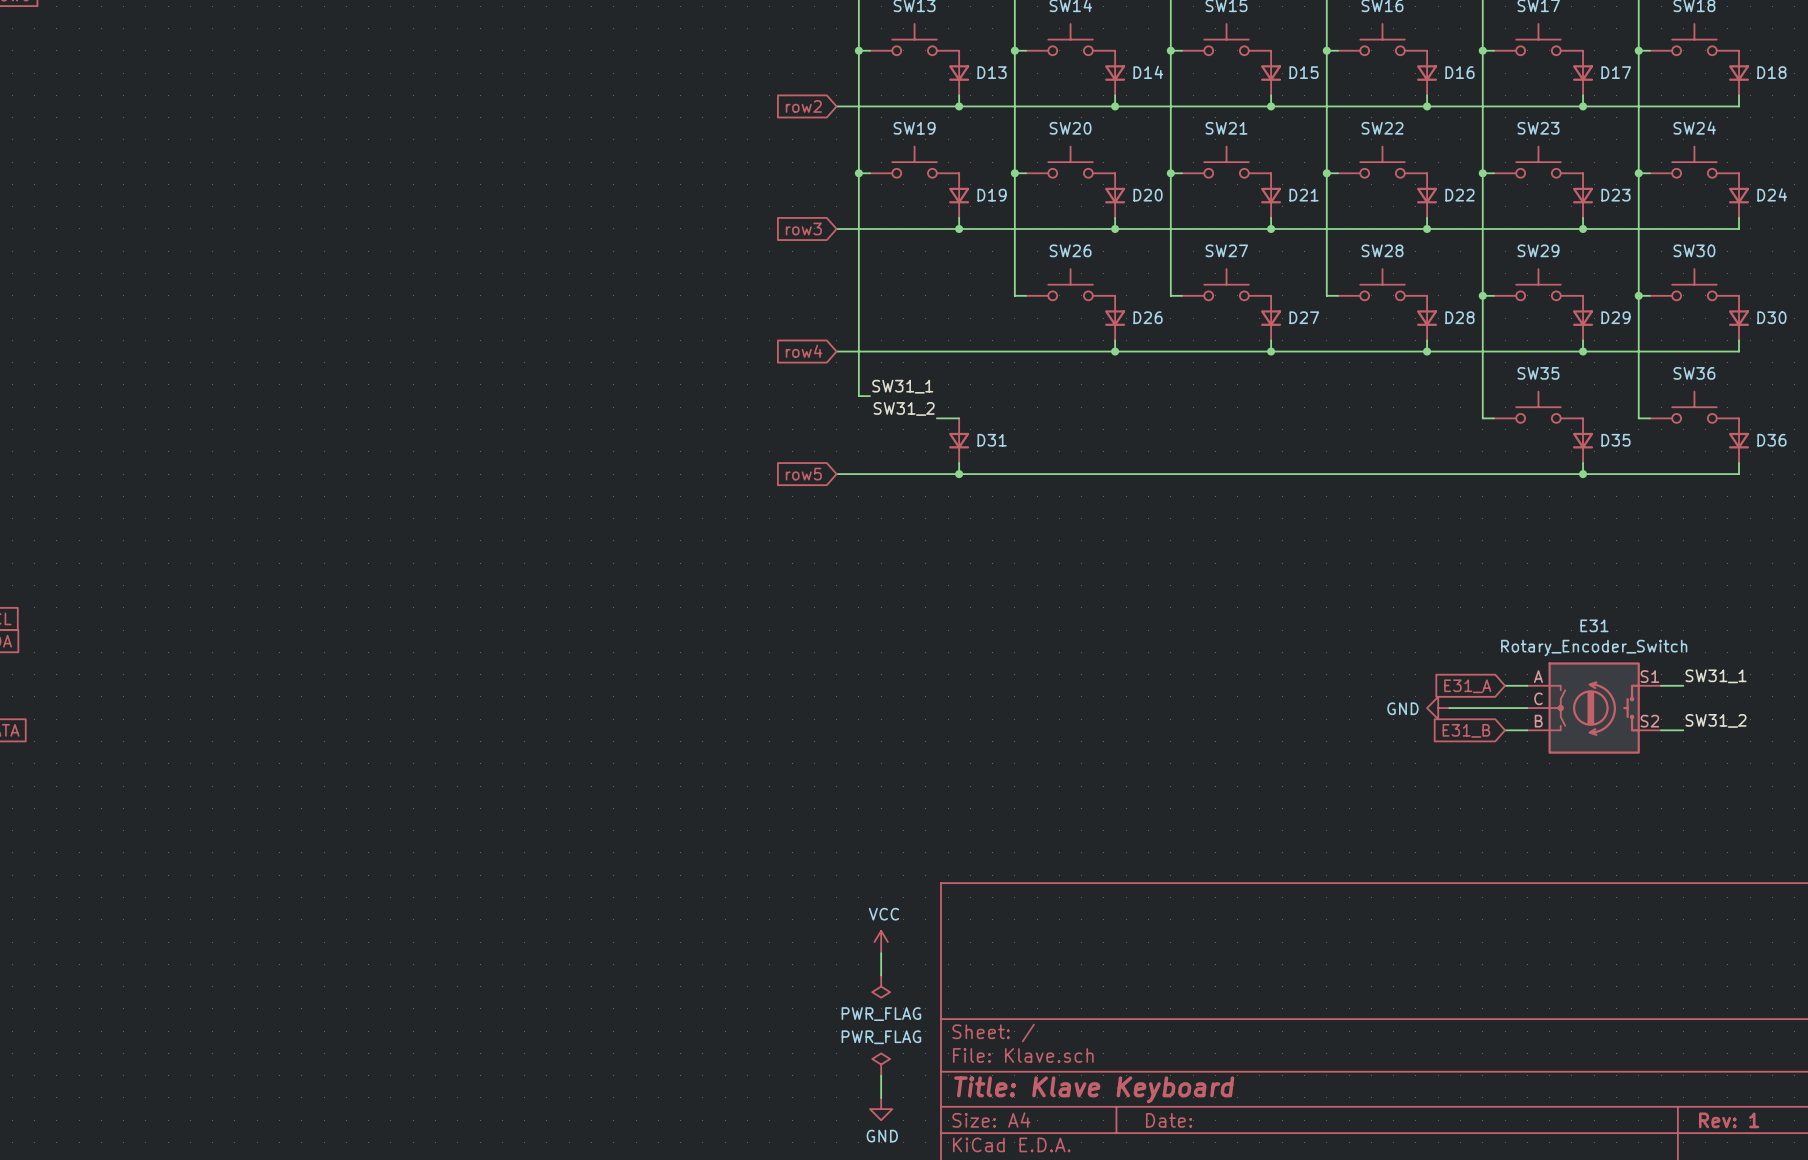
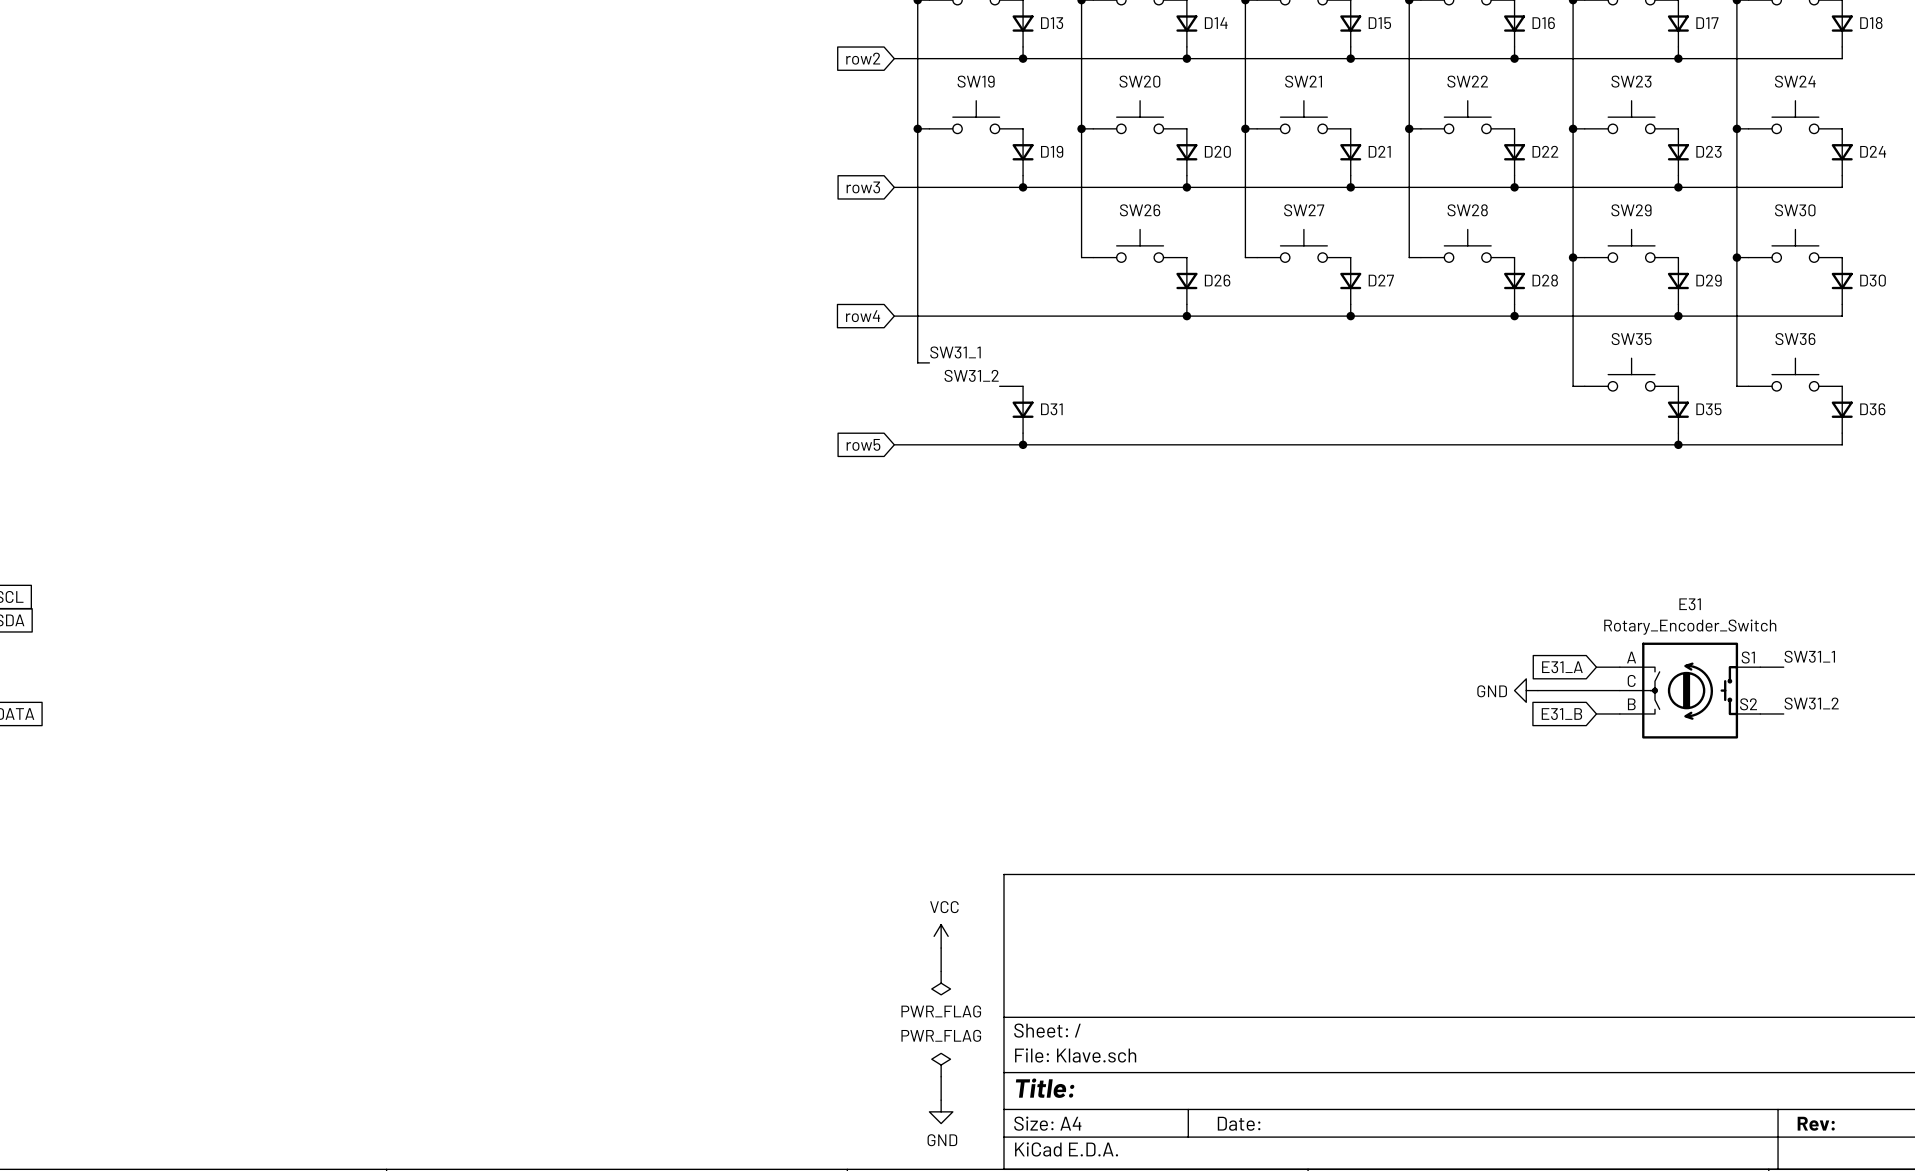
title block: Title: Klave Keyboard (1094, 1089) -> Title: (1045, 1088)
title block: Rev: 1 (1729, 1120) -> Rev: (1816, 1123)

